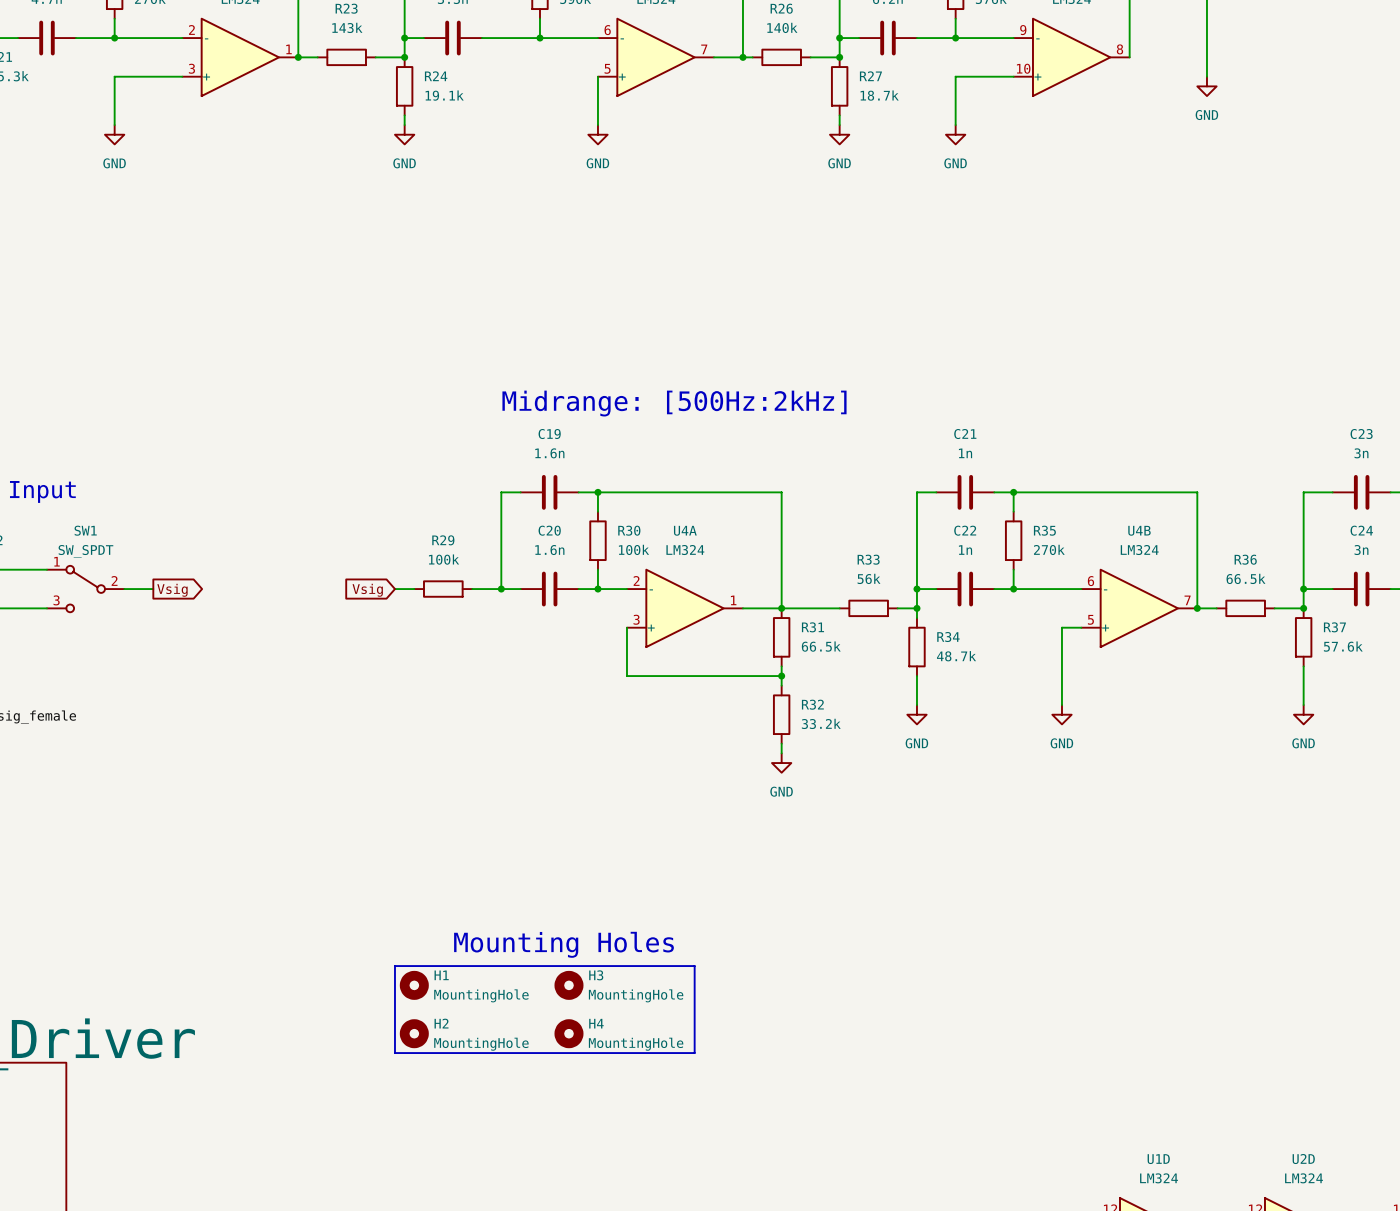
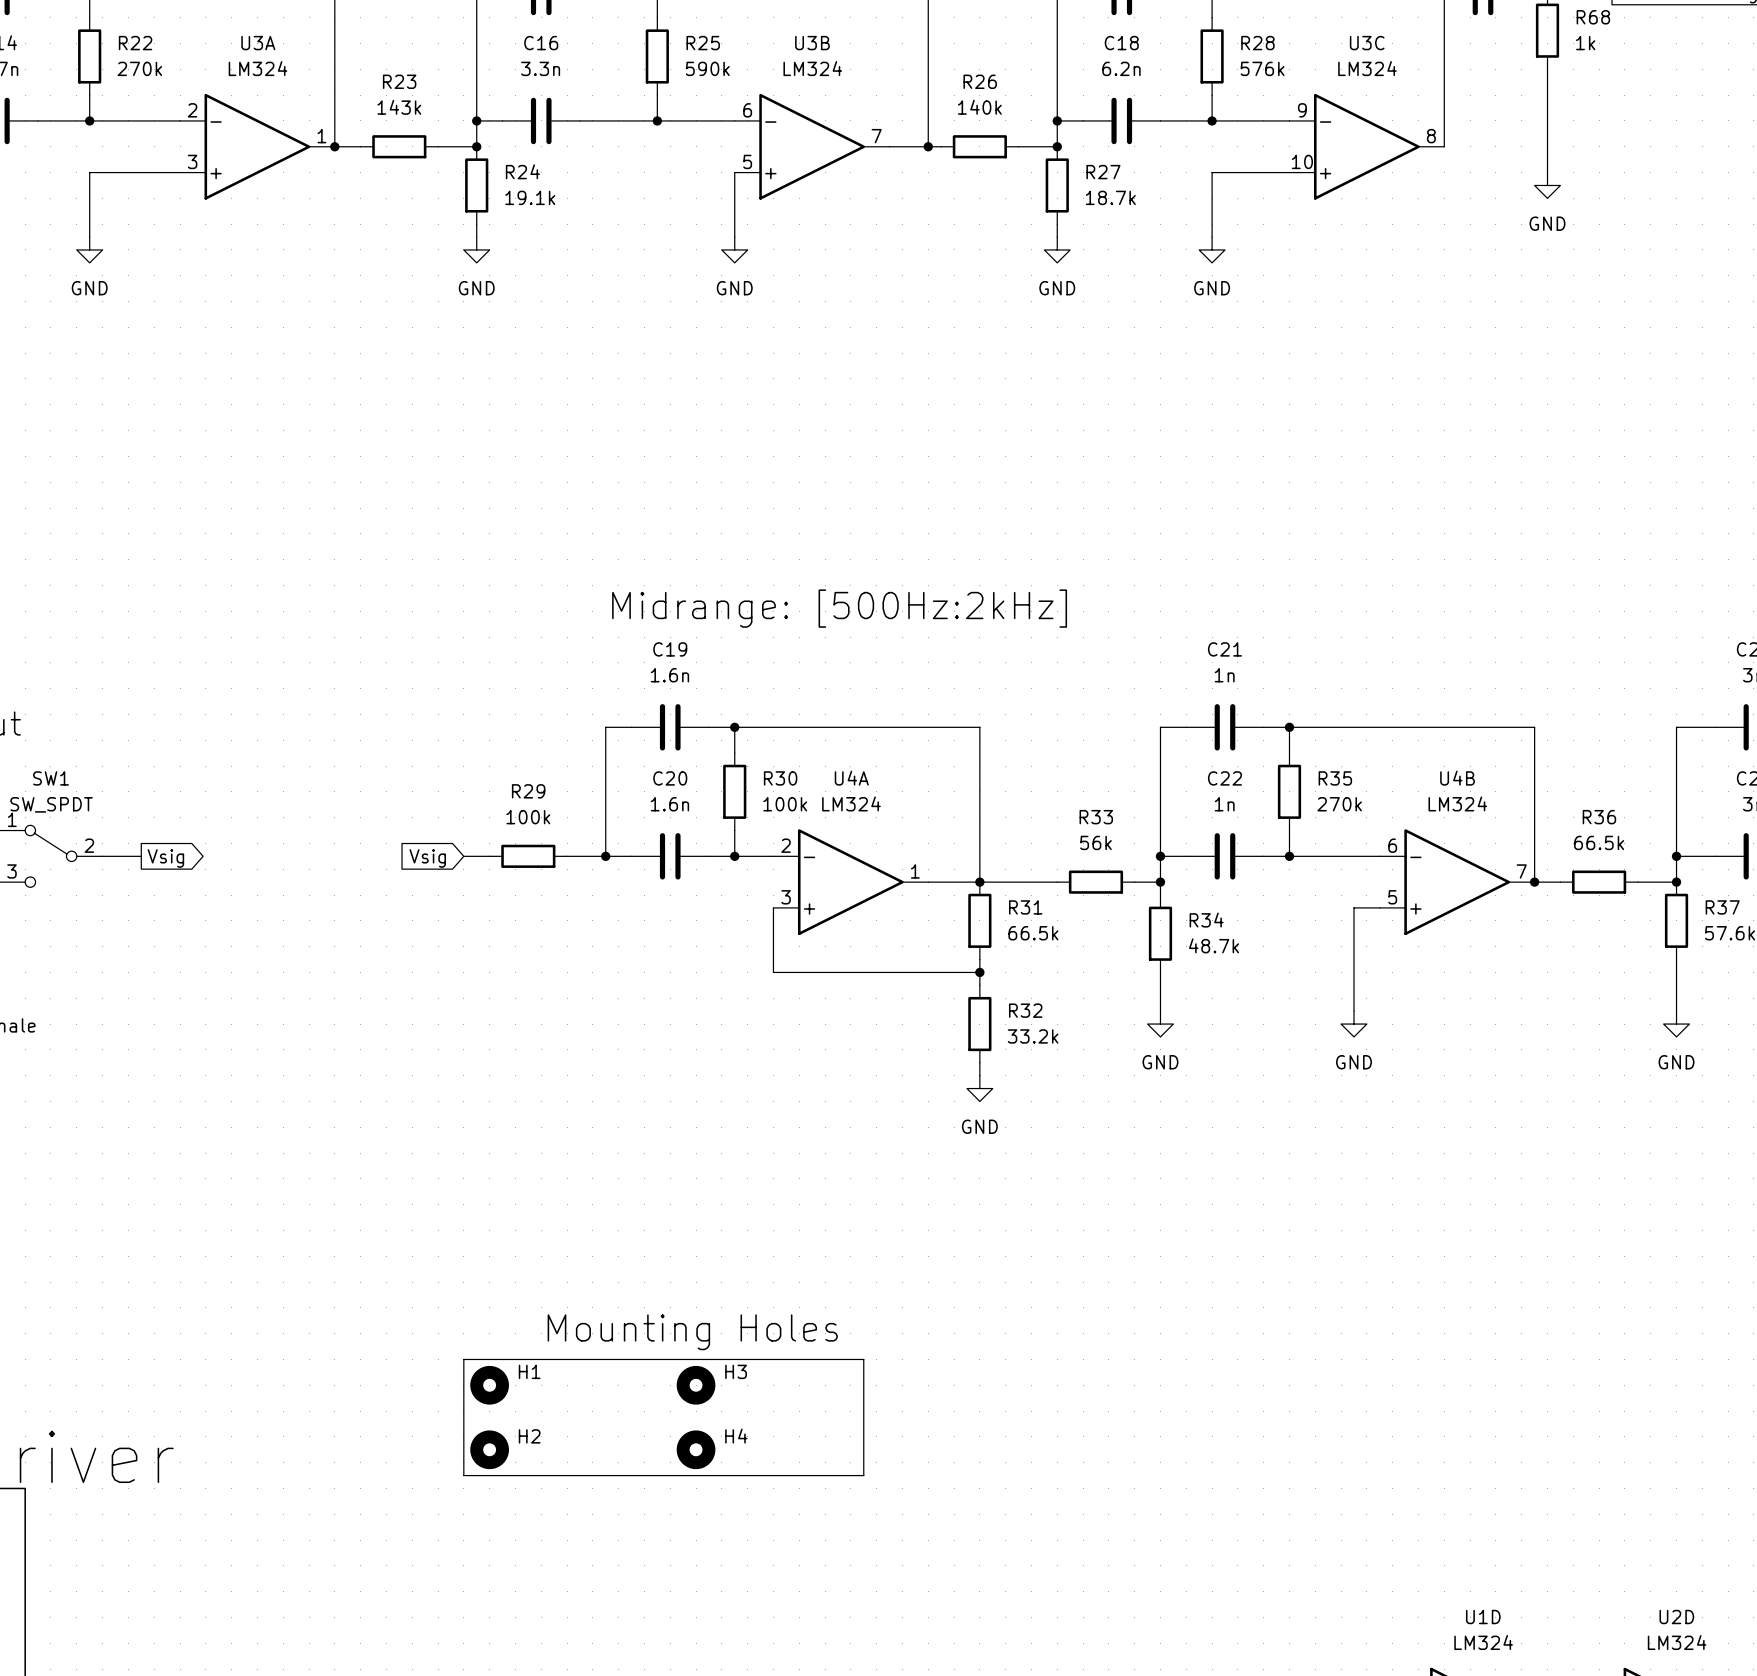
H1 value: MountingHole (481, 995) -> none
H3 value: MountingHole (636, 995) -> none
H2 value: MountingHole (481, 1044) -> none
H4 value: MountingHole (636, 1044) -> none

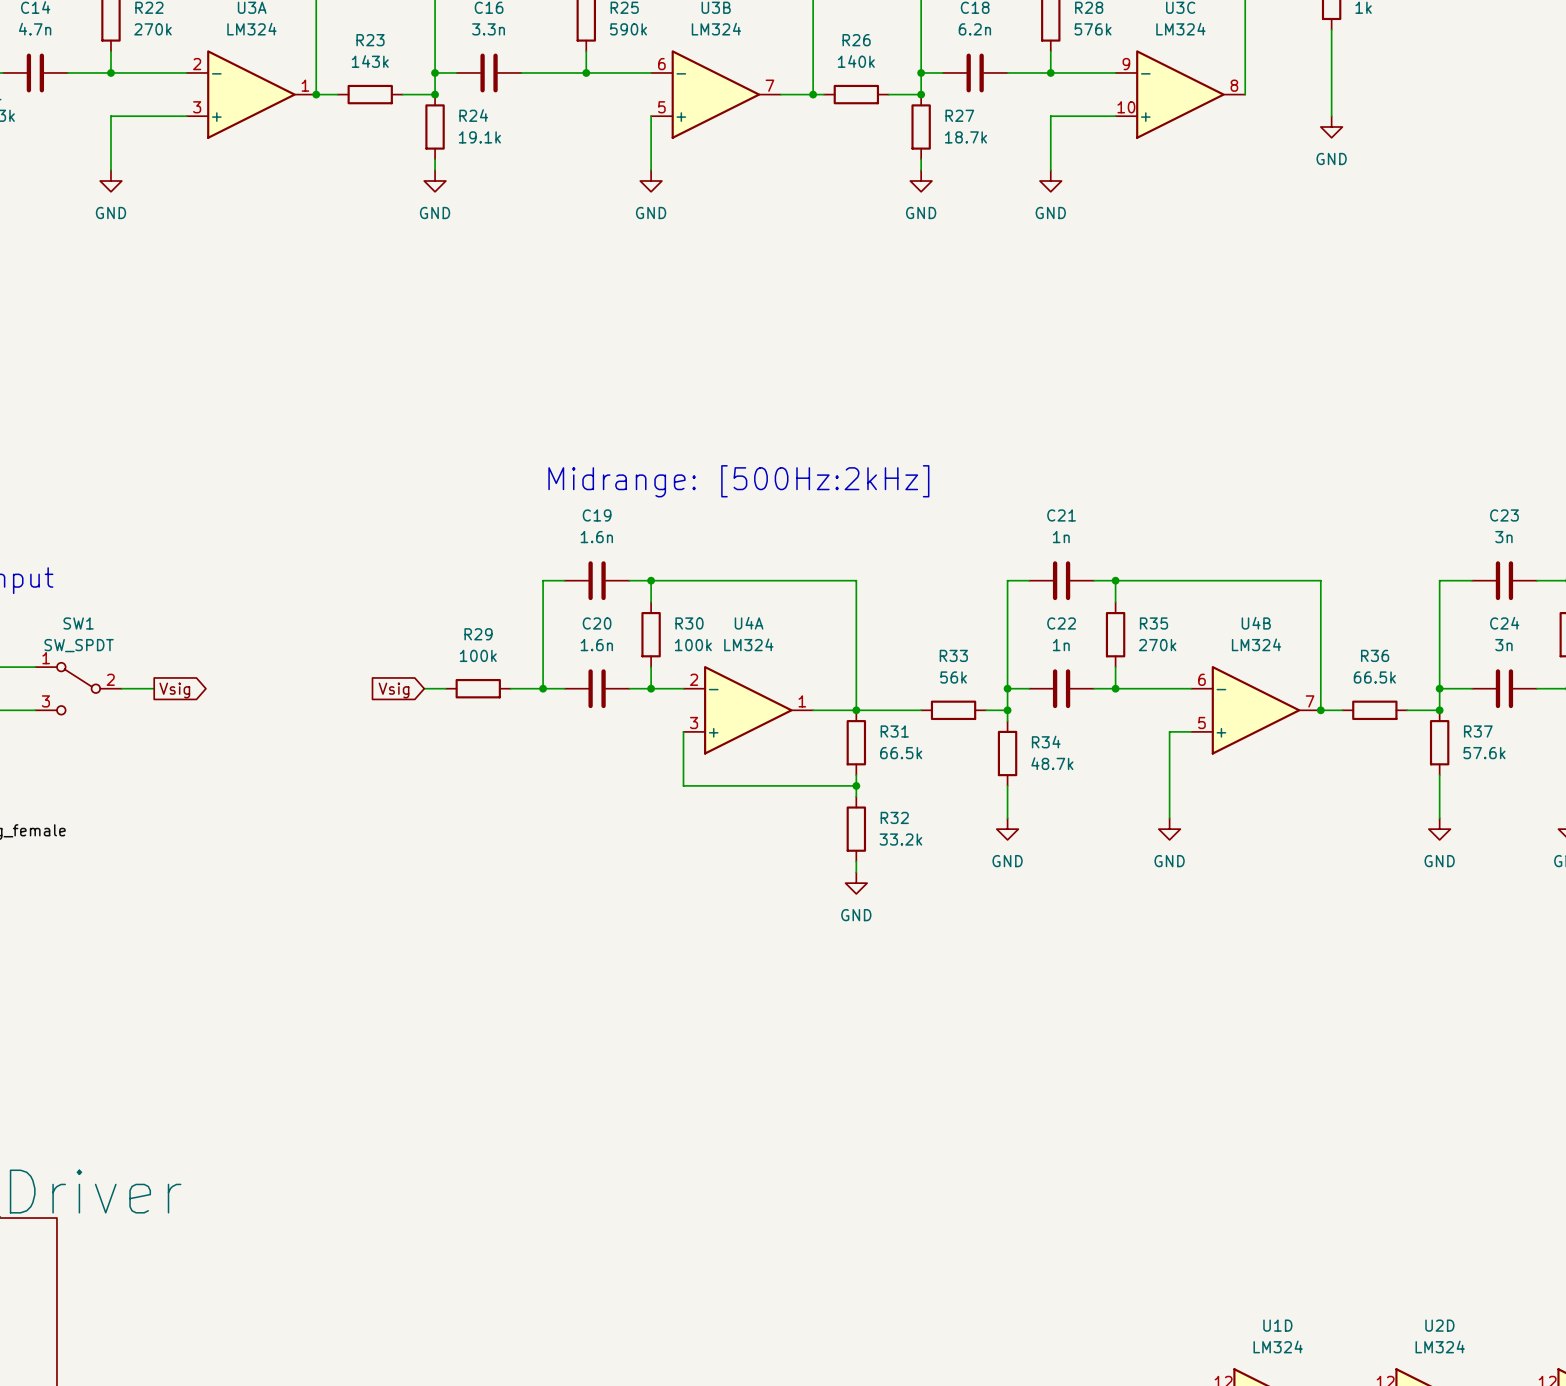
text: Mounting Holes (692, 1332) -> none
line: (463, 1359) (863, 1359) (863, 1475) (463, 1475) (463, 1359) -> none
H1: (489, 1385) -> none
H3: (696, 1385) -> none
H2: (489, 1449) -> none
H4: (696, 1449) -> none

